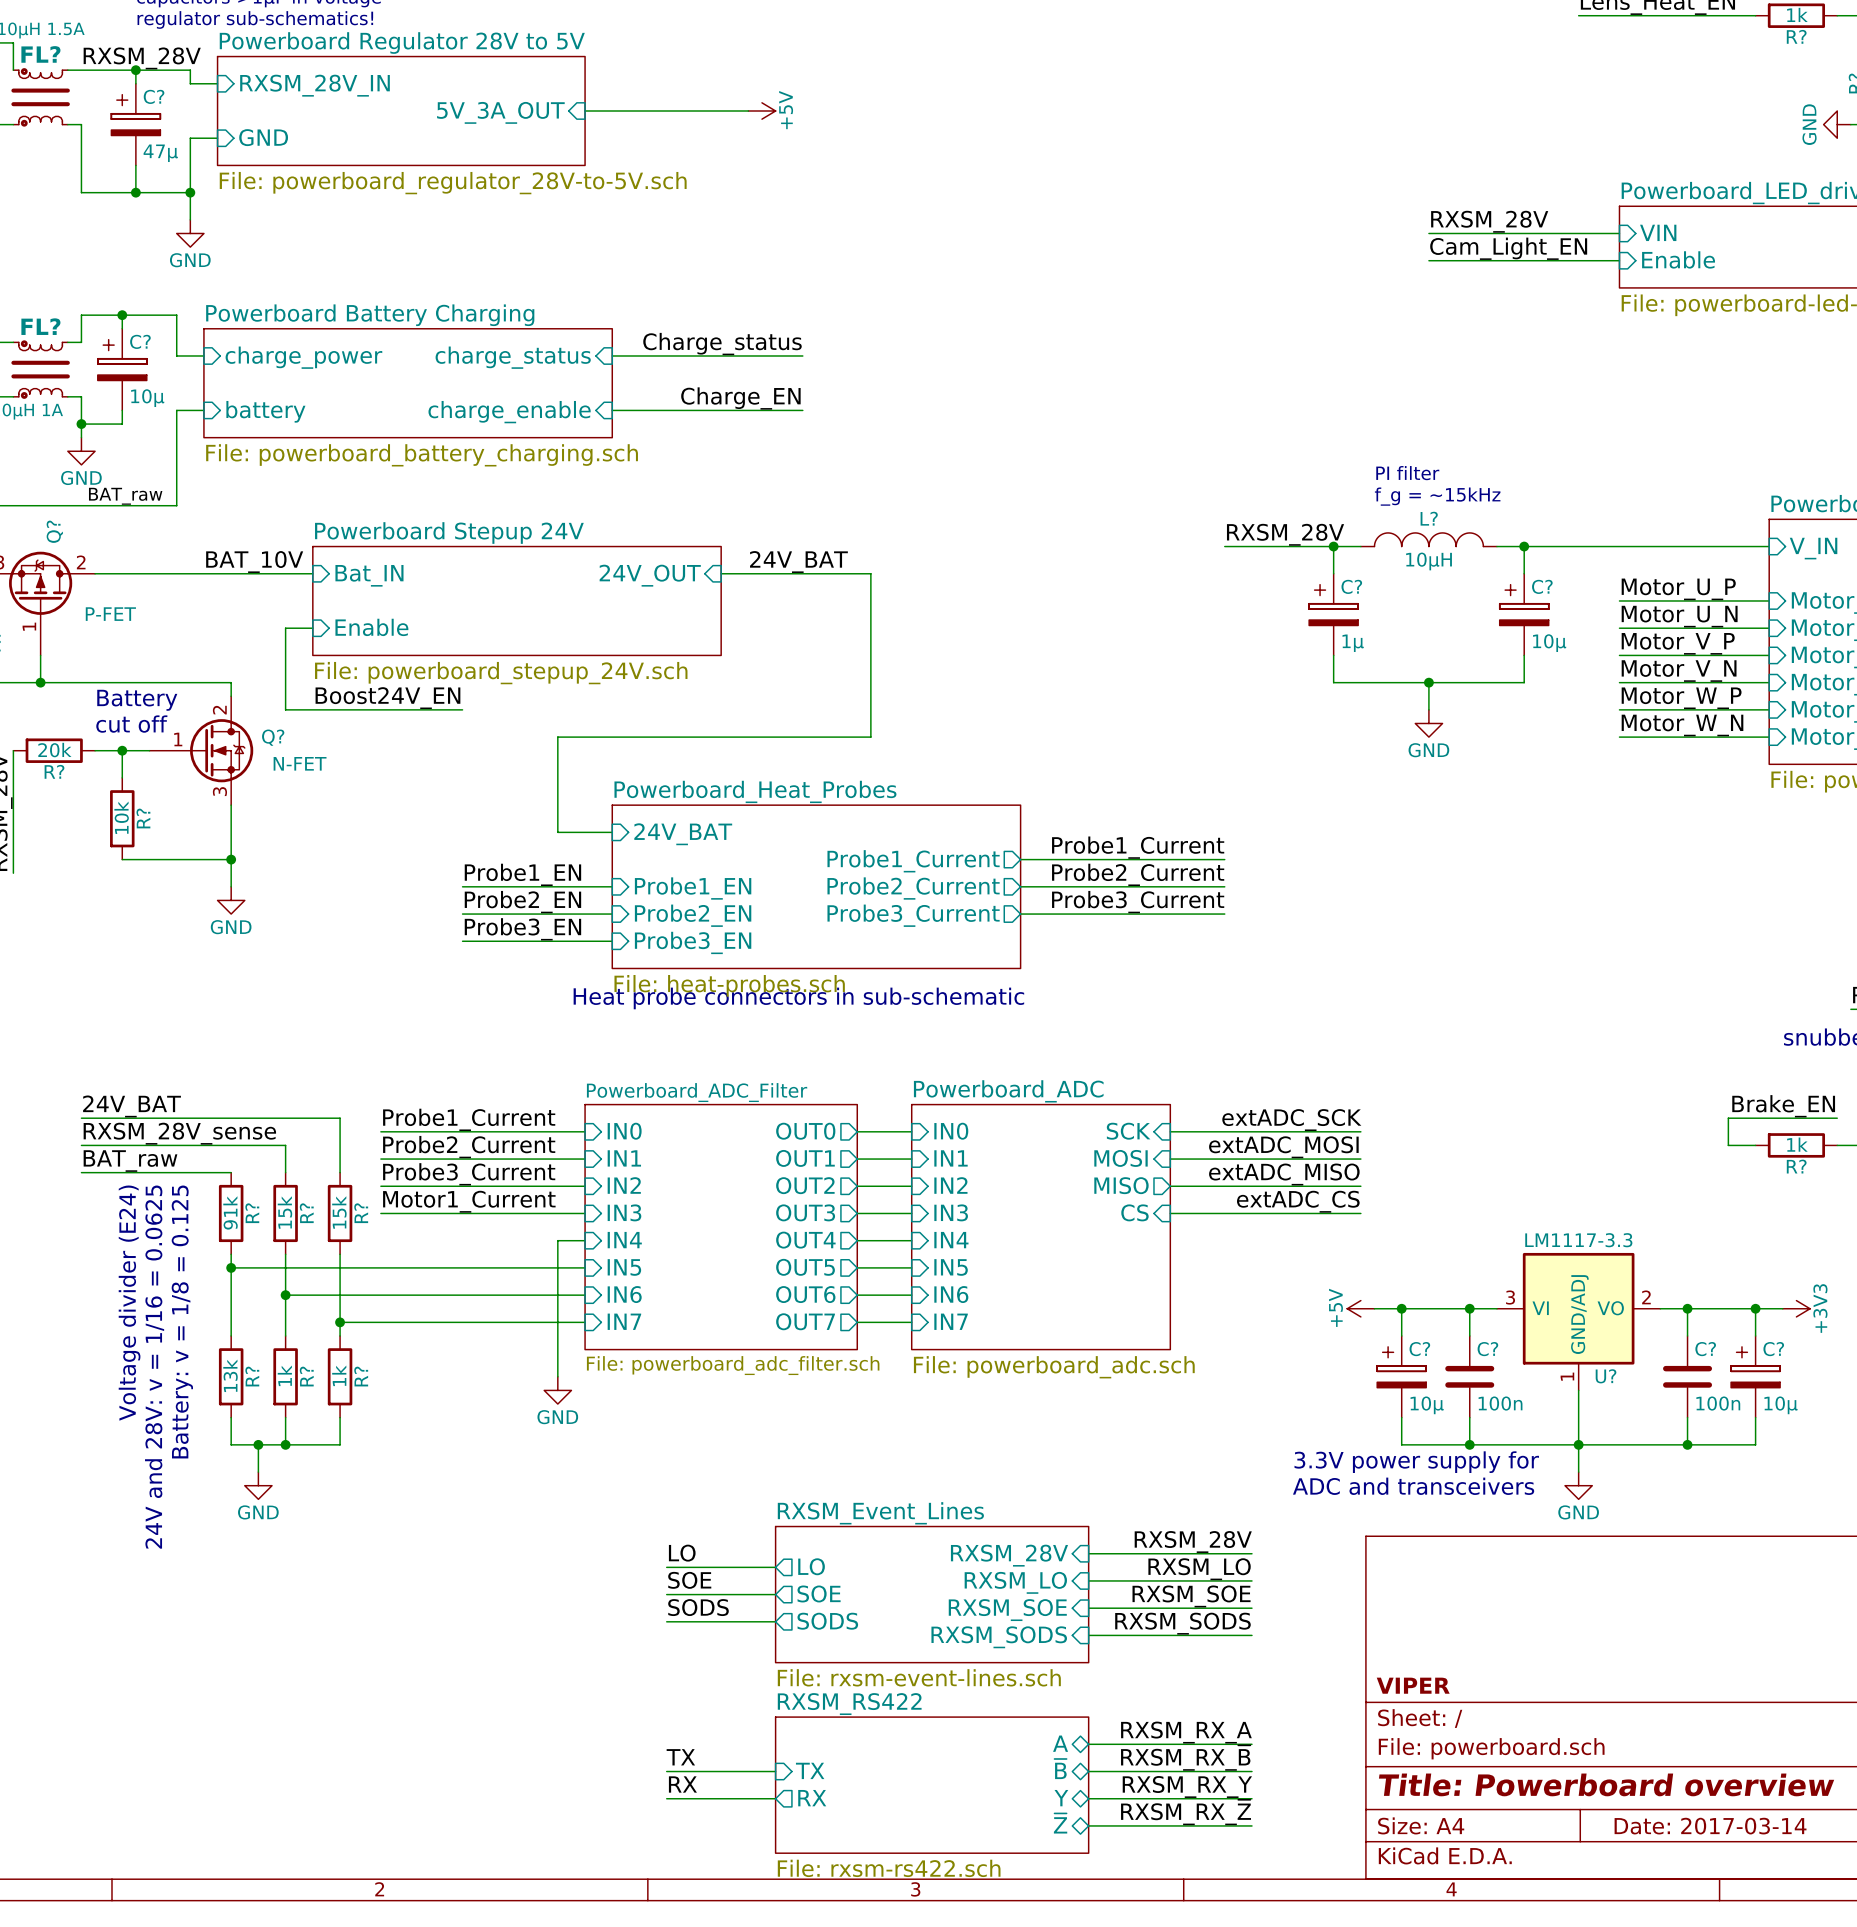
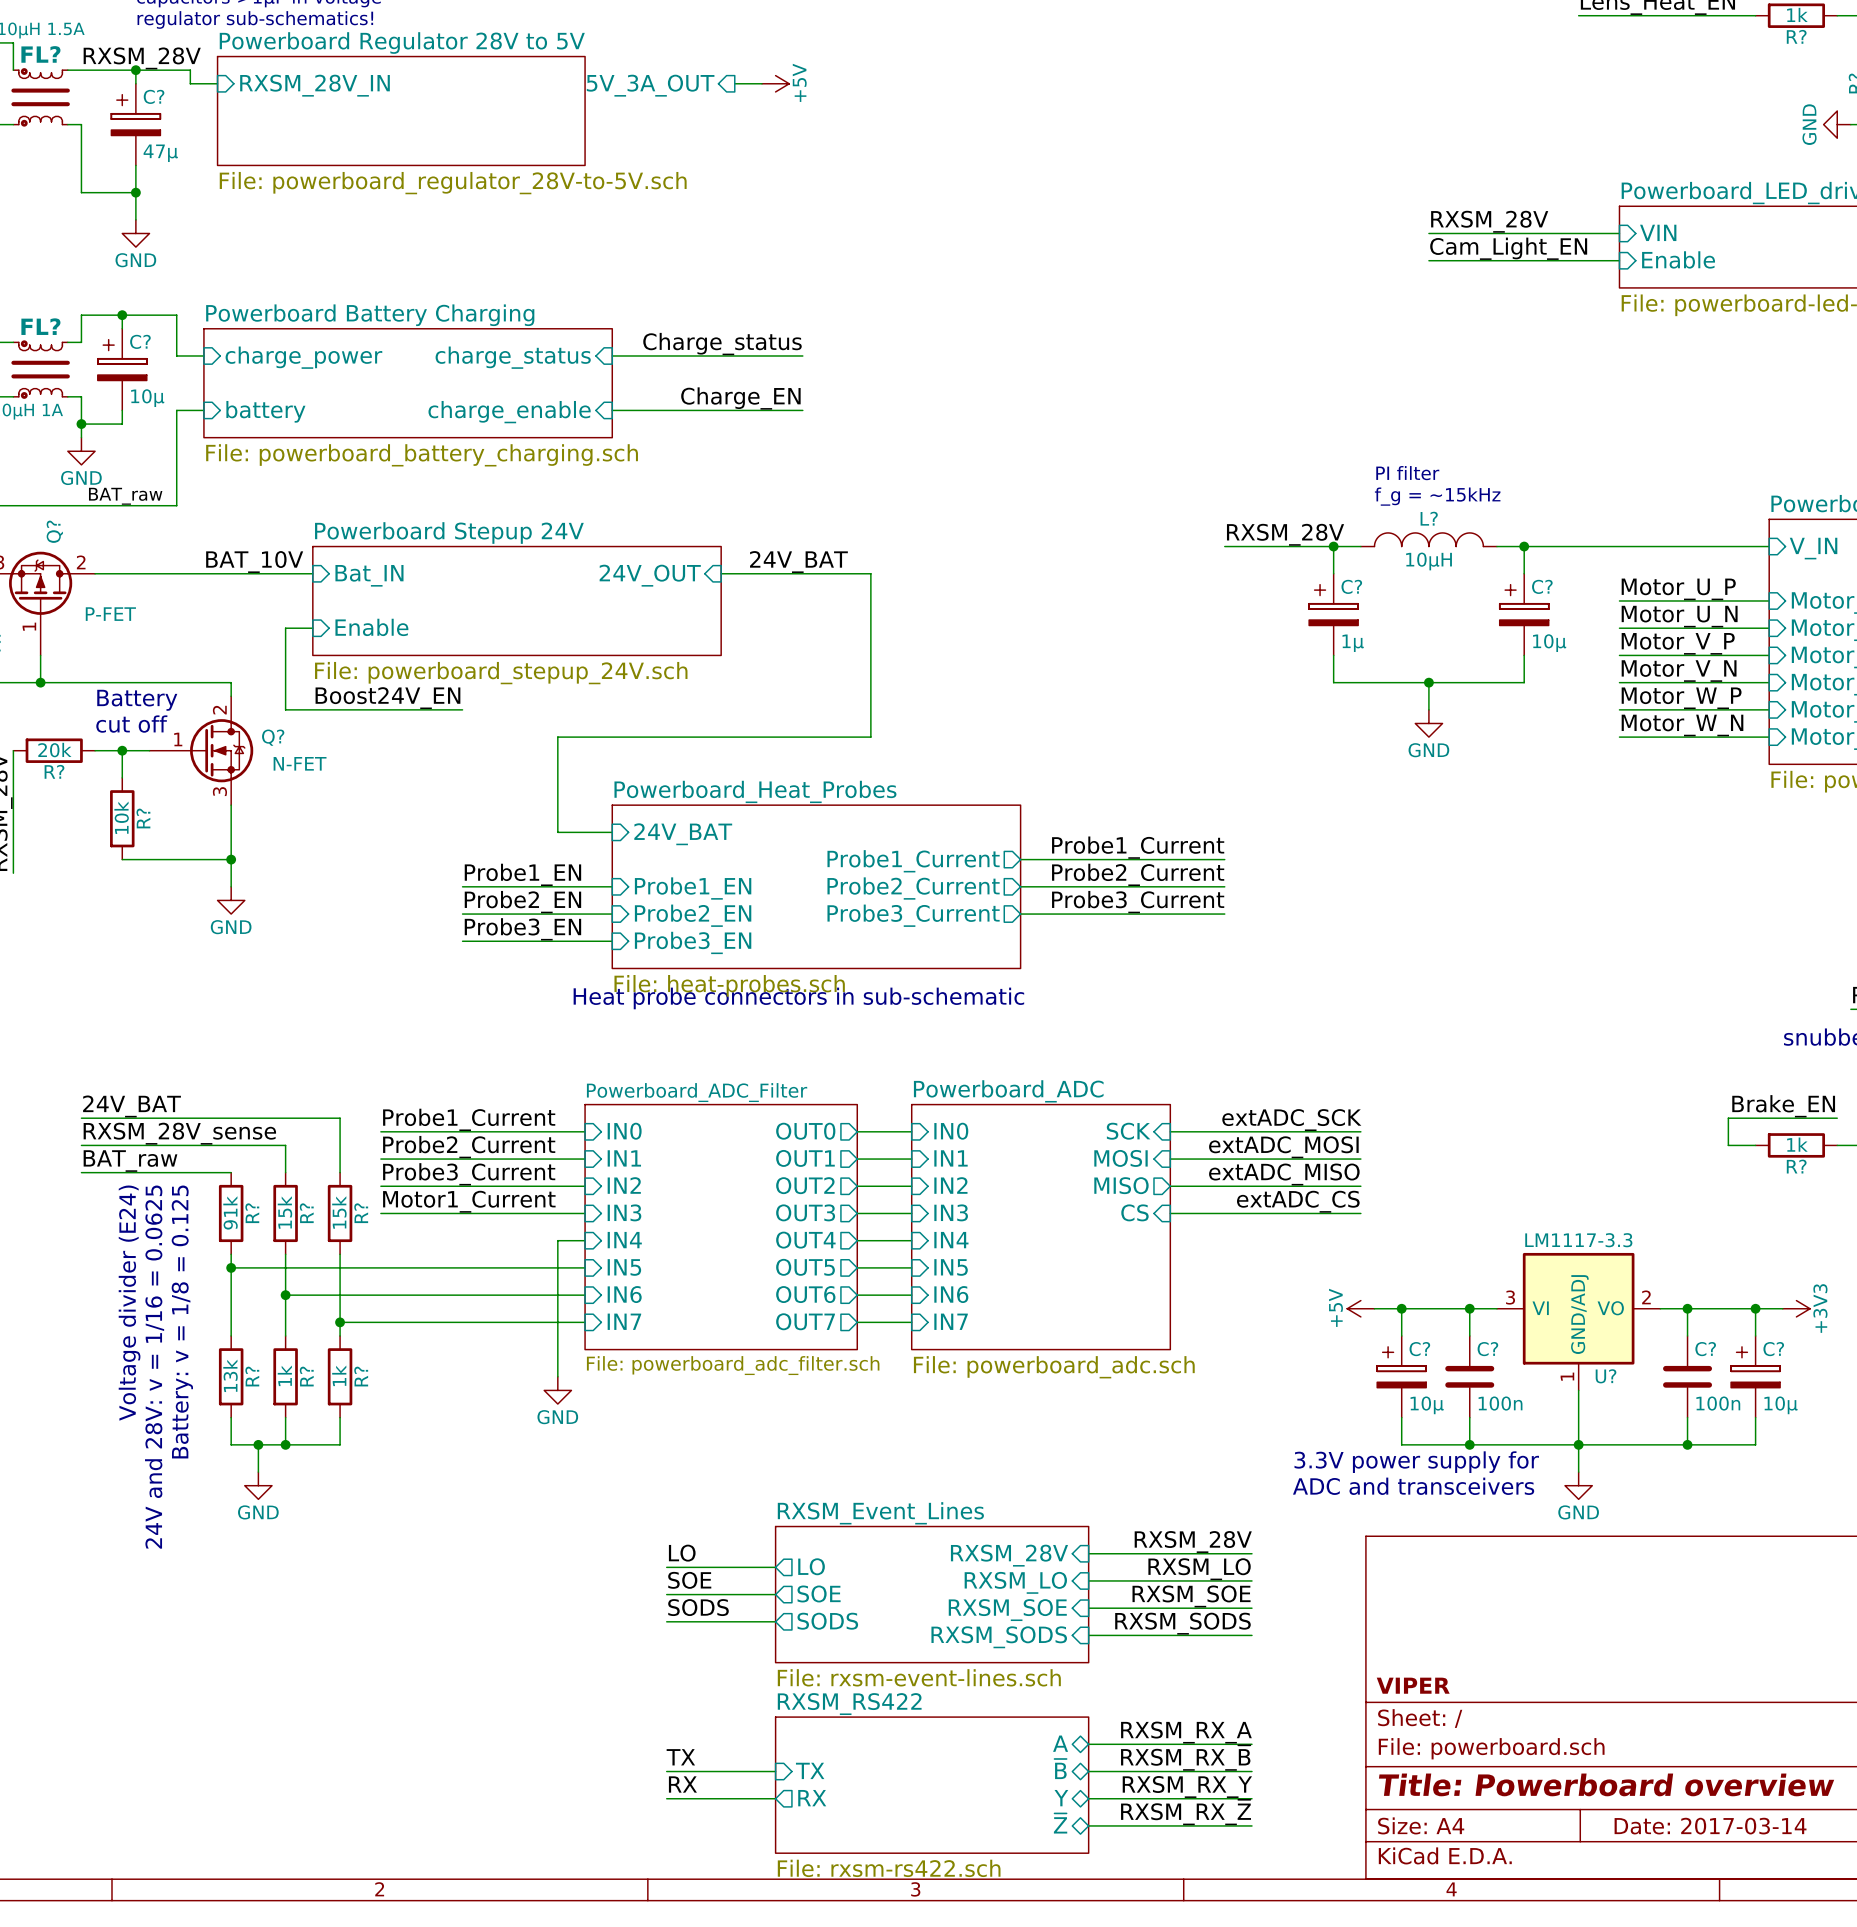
wire: none -> (734, 83) (761, 83)
wire: (585, 110) (748, 110) -> none
power symbol position: +5V (761, 110) -> +5V (775, 83)
sheet pin position: 5V_3A_OUT (500, 112) -> 5V_3A_OUT (650, 85)
sheet pin: GND (263, 137) -> none
wire: (217, 138) (190, 138) (190, 219) -> none
wire: (135, 192) (190, 192) -> (135, 192) (135, 219)
junction: (190, 192) -> none
power symbol position: GND (190, 233) -> GND (135, 233)

